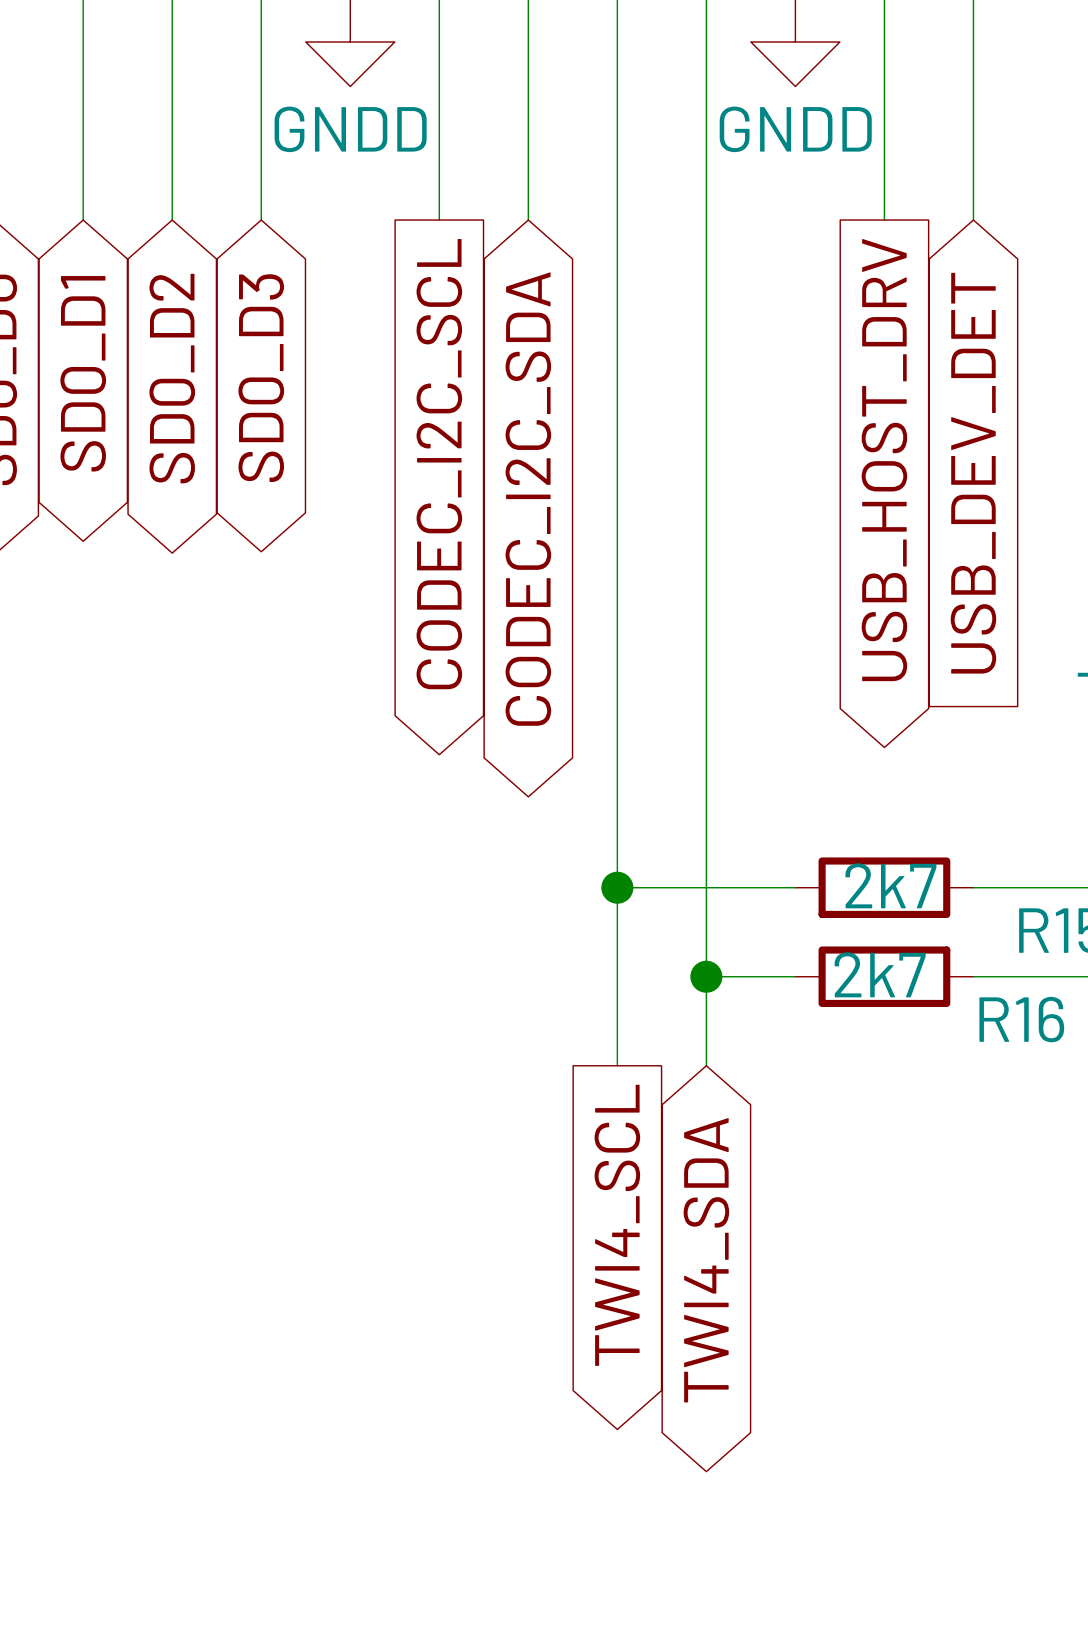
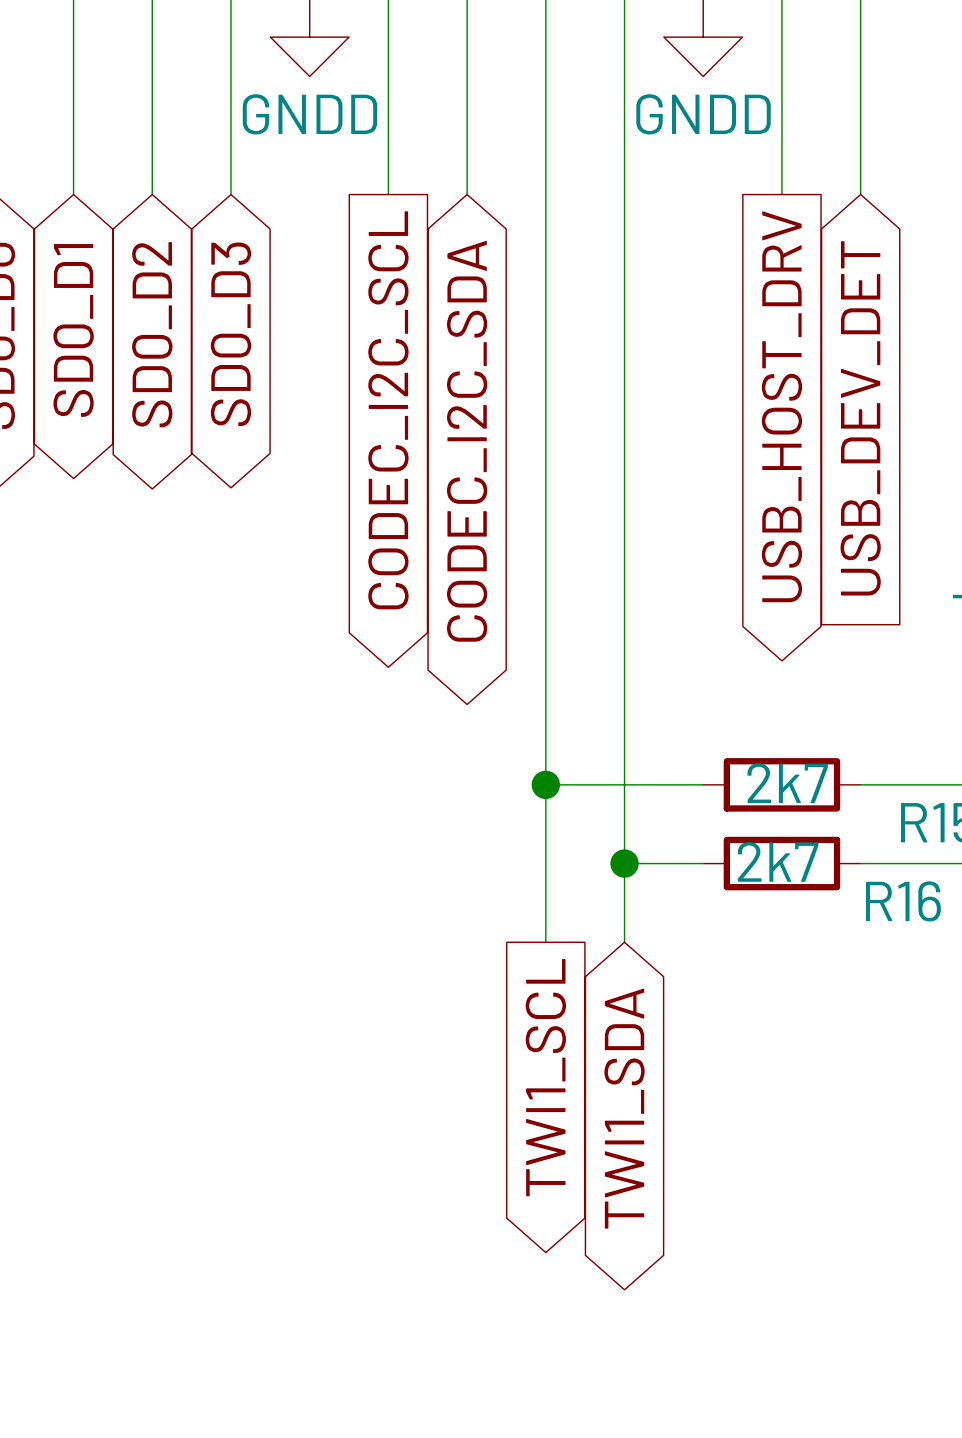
global label: TWI4_SCL (617, 1225) -> TWI1_SCL (545, 1077)
global label: TWI4_SDA (706, 1260) -> TWI1_SDA (624, 1108)

